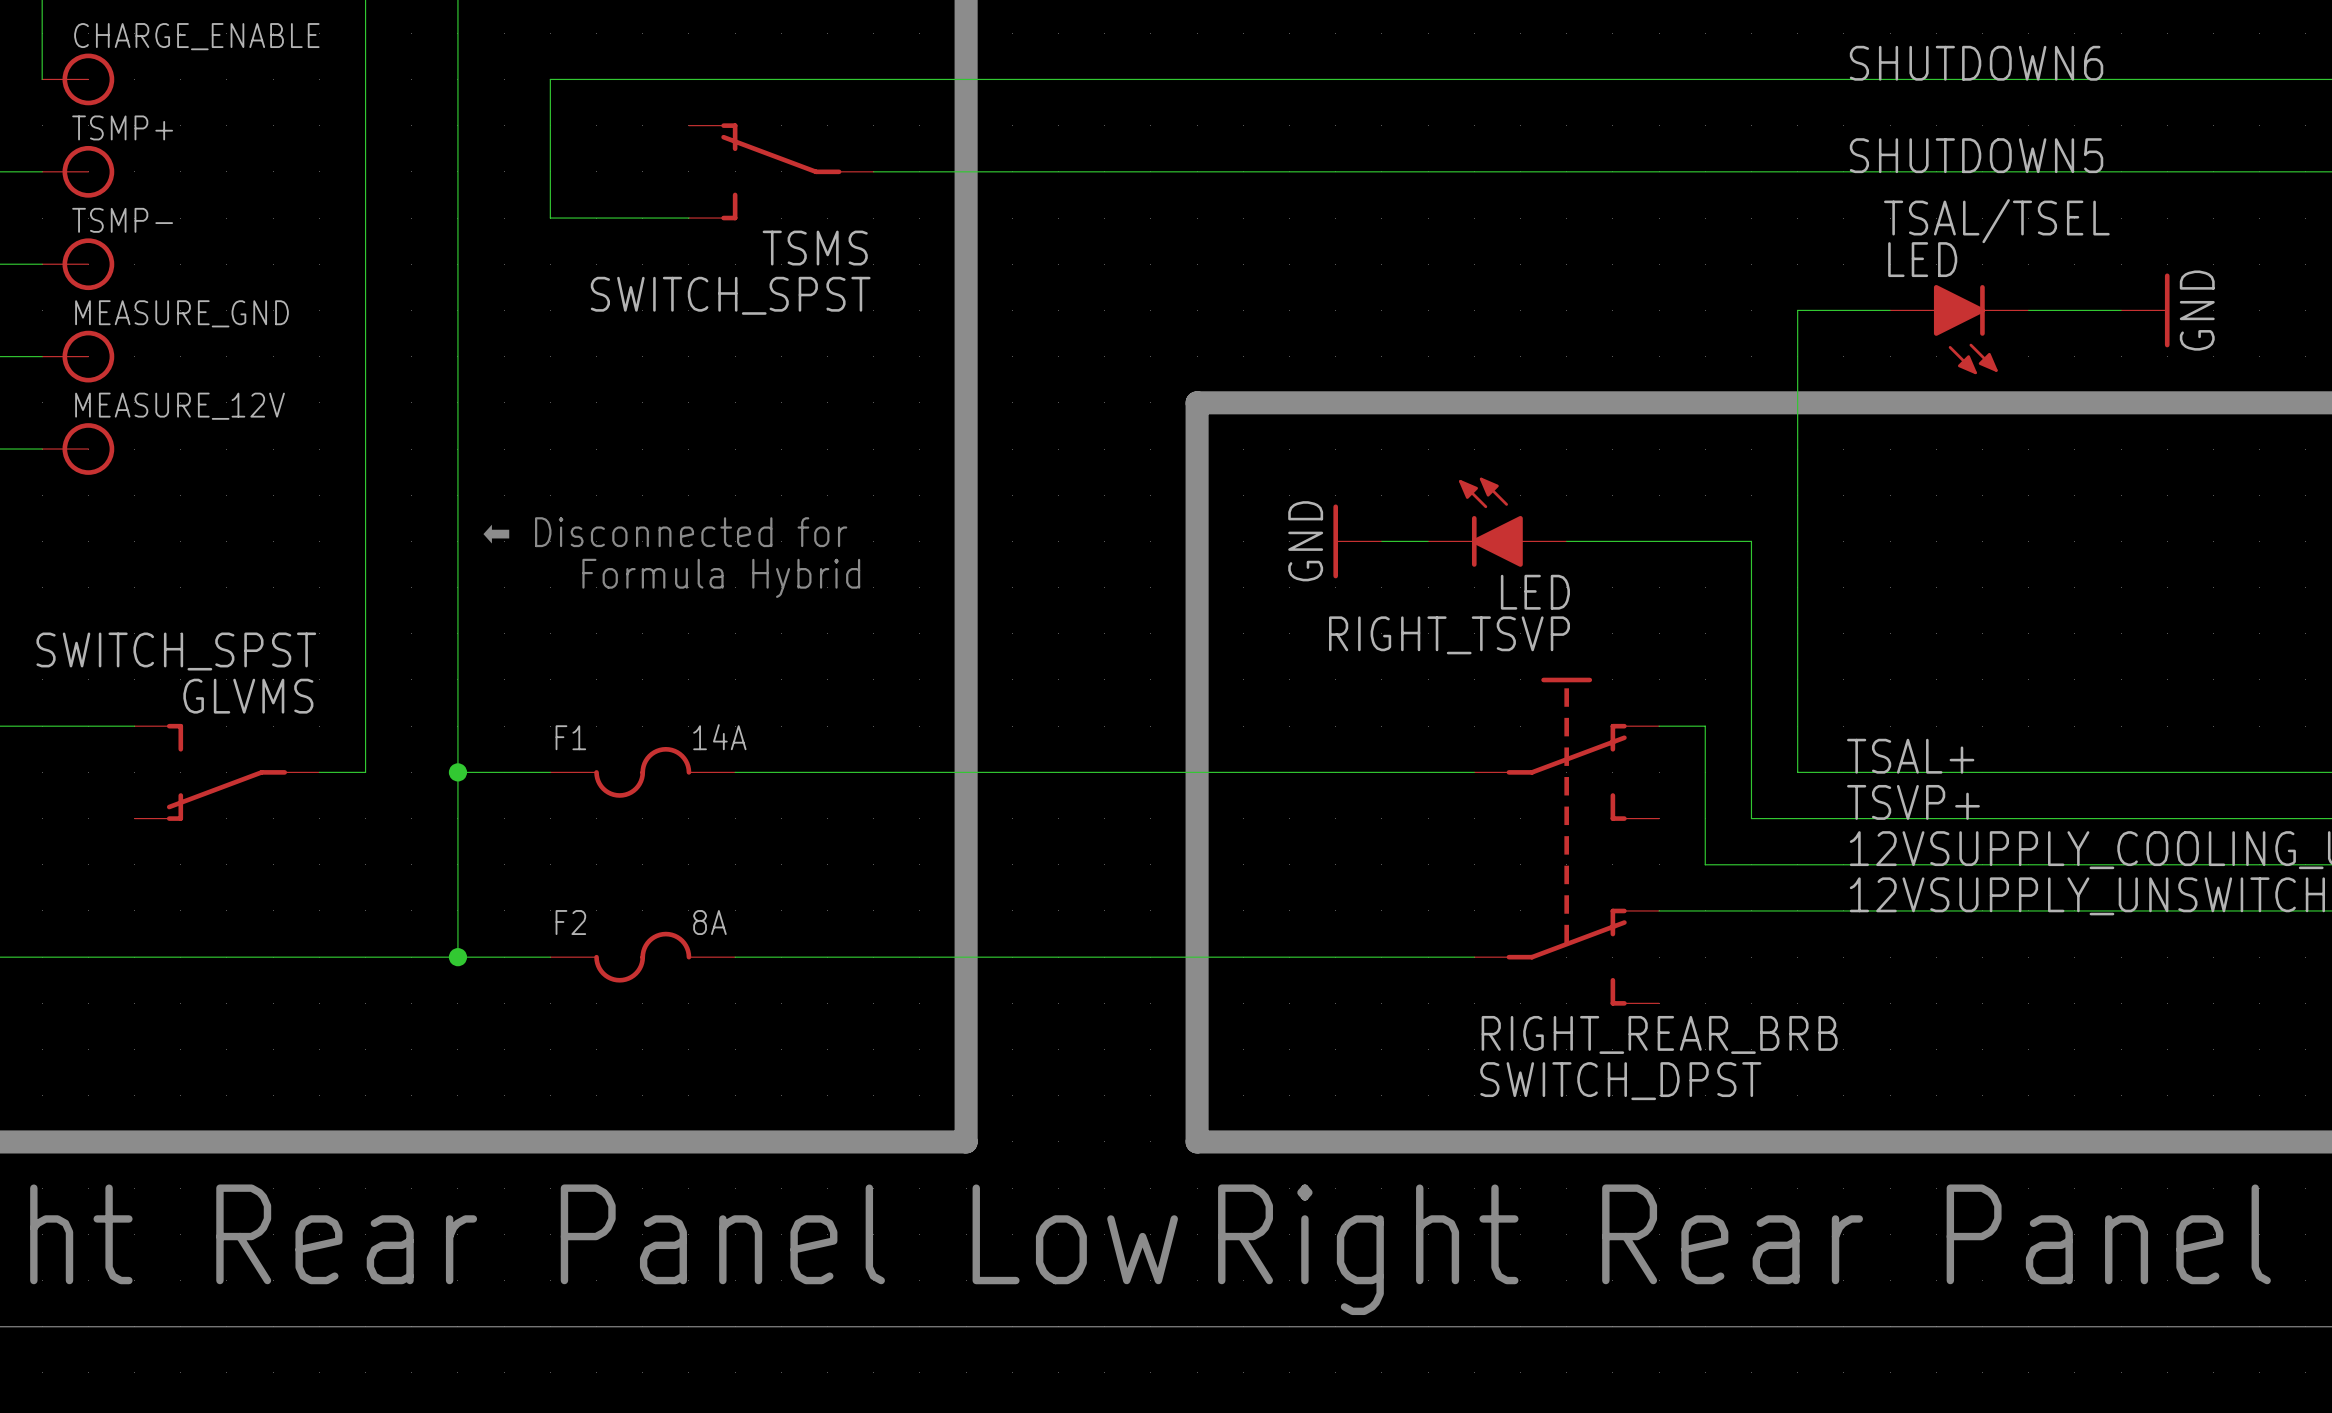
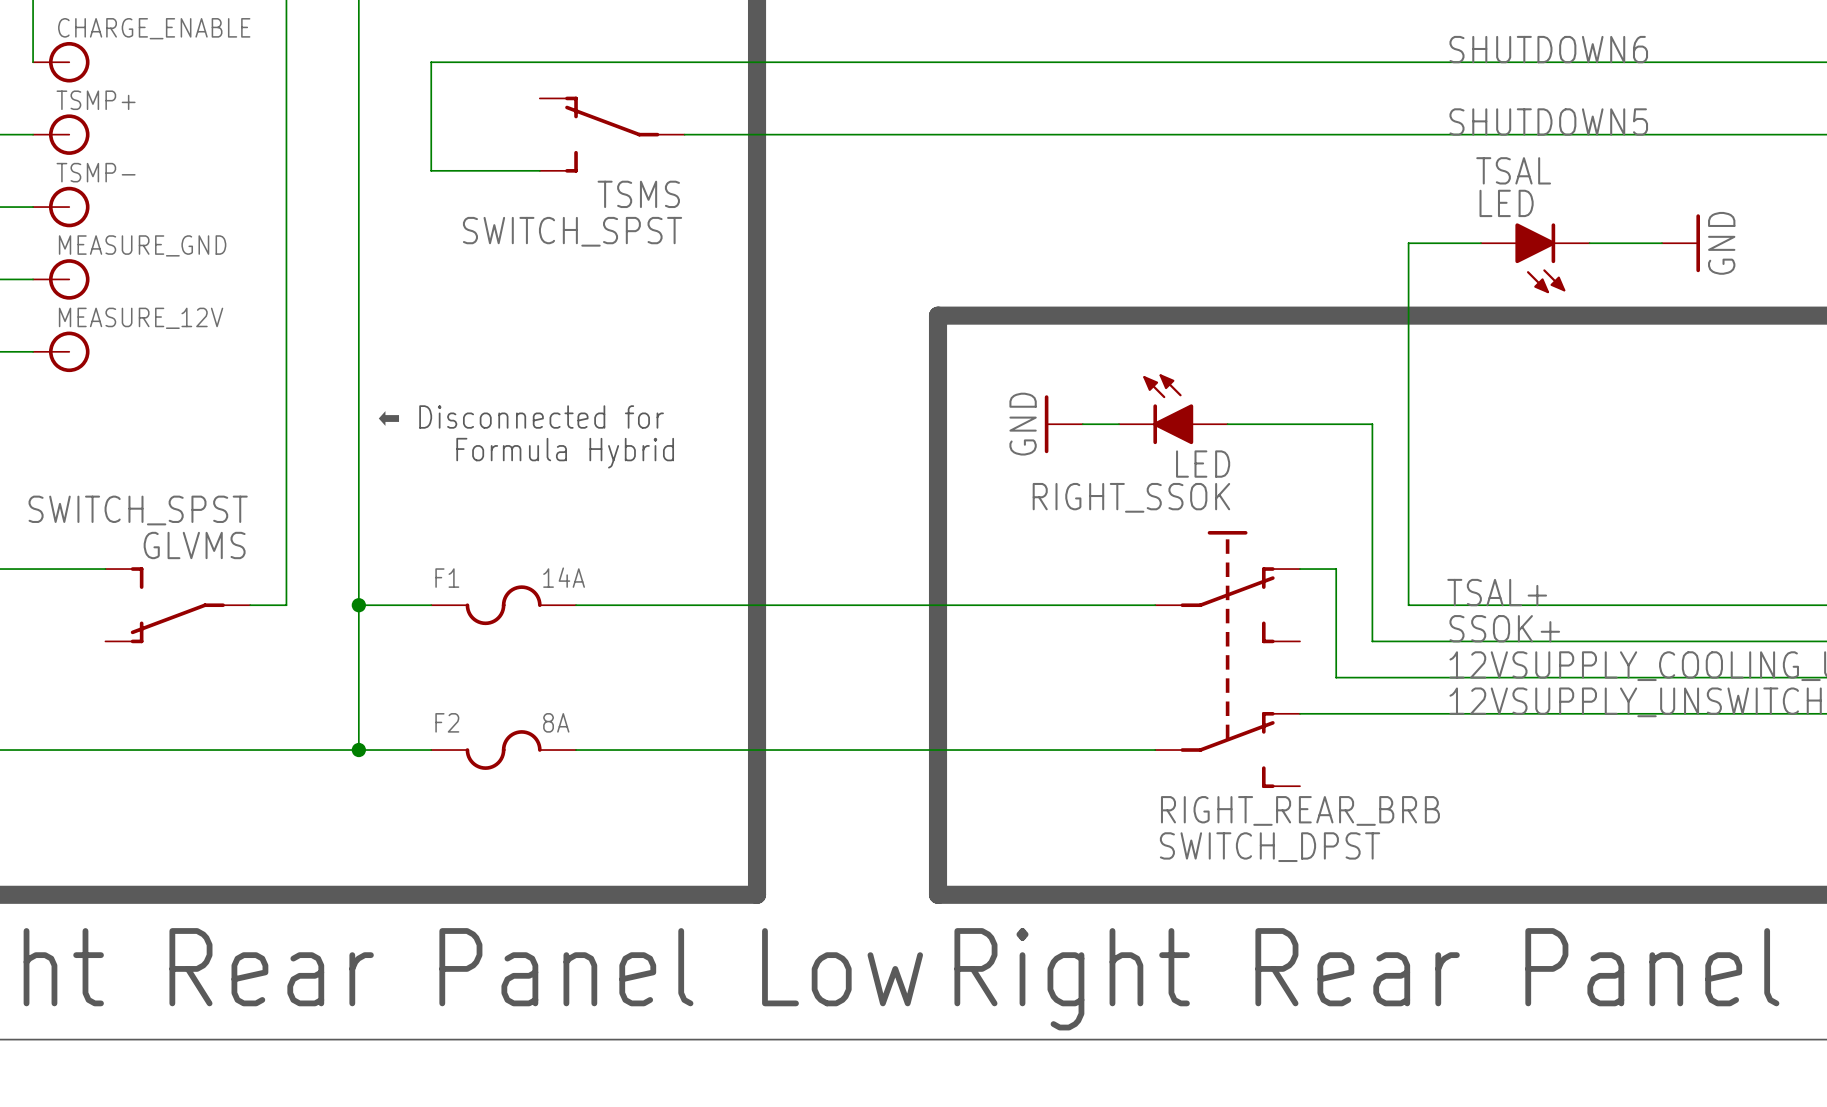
TSAL/TSEL name: TSAL/TSEL (1996, 221) -> TSAL (1513, 170)
RIGHT_TSVP name: RIGHT_TSVP (1449, 635) -> RIGHT_SSOK (1131, 497)
label: TSVP+ (1913, 802) -> SSOK+ (1504, 628)

